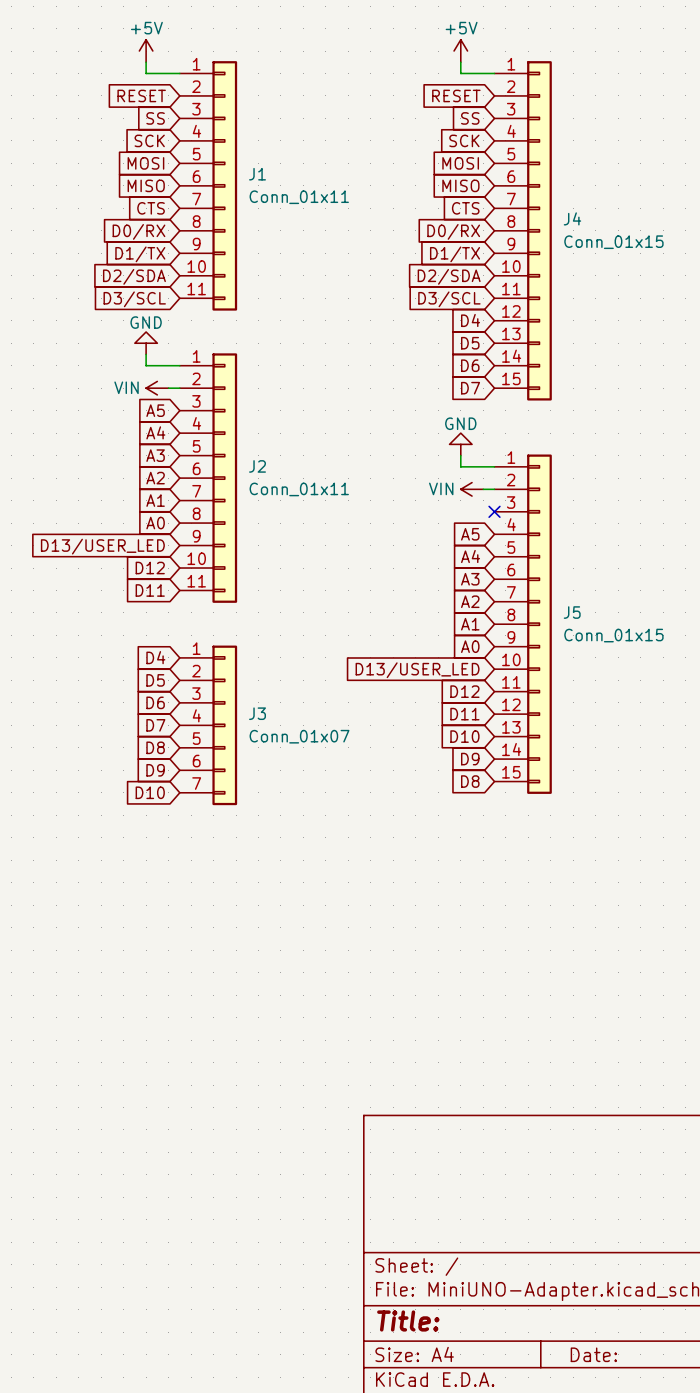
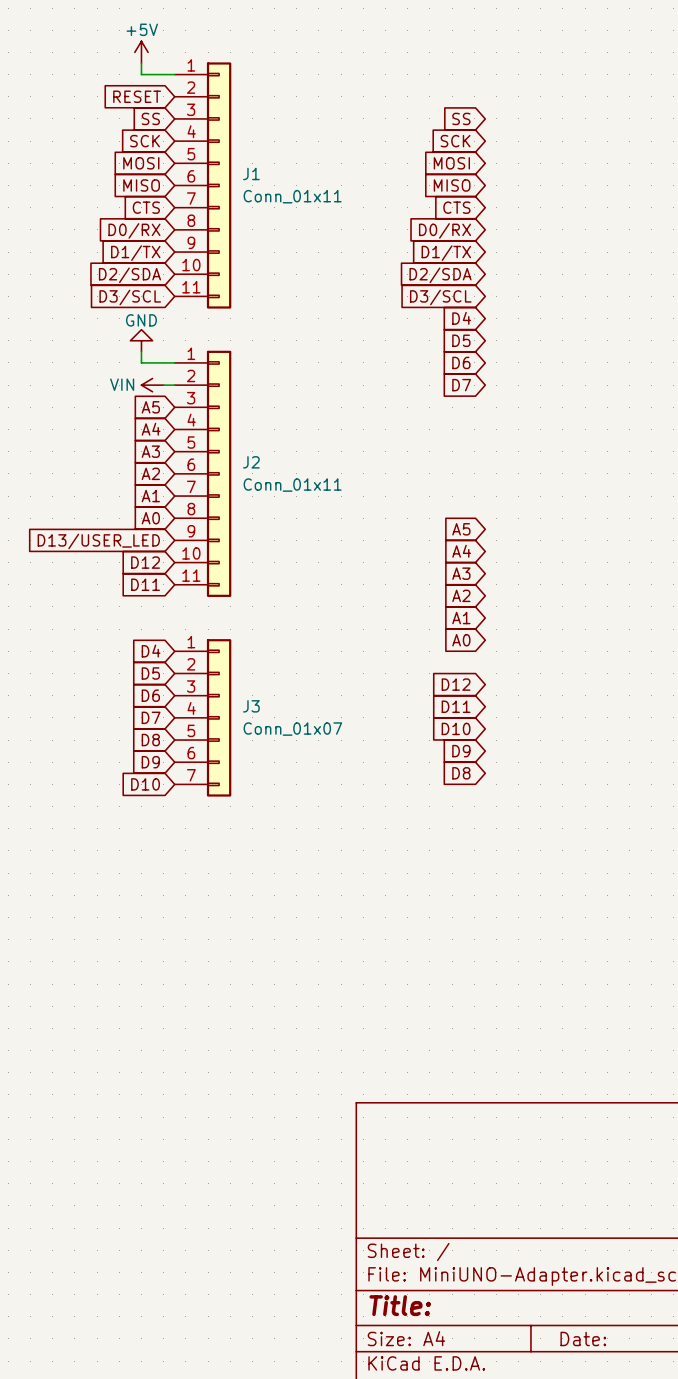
power symbol: +5V (460, 51) -> none
wire: (460, 62) (460, 73) (494, 73) -> none
global label: RESET (456, 95) -> none
J4: Conn_01x15 (523, 230) -> none
power symbol: GND (460, 444) -> none
wire: (460, 455) (460, 466) (494, 466) -> none
power symbol: VIN (472, 489) -> none
wire: (483, 489) (494, 489) -> none
no-connect mark: (494, 511) -> none
J5: Conn_01x15 (523, 624) -> none
global label: D13/USER_LED (417, 670) -> none

